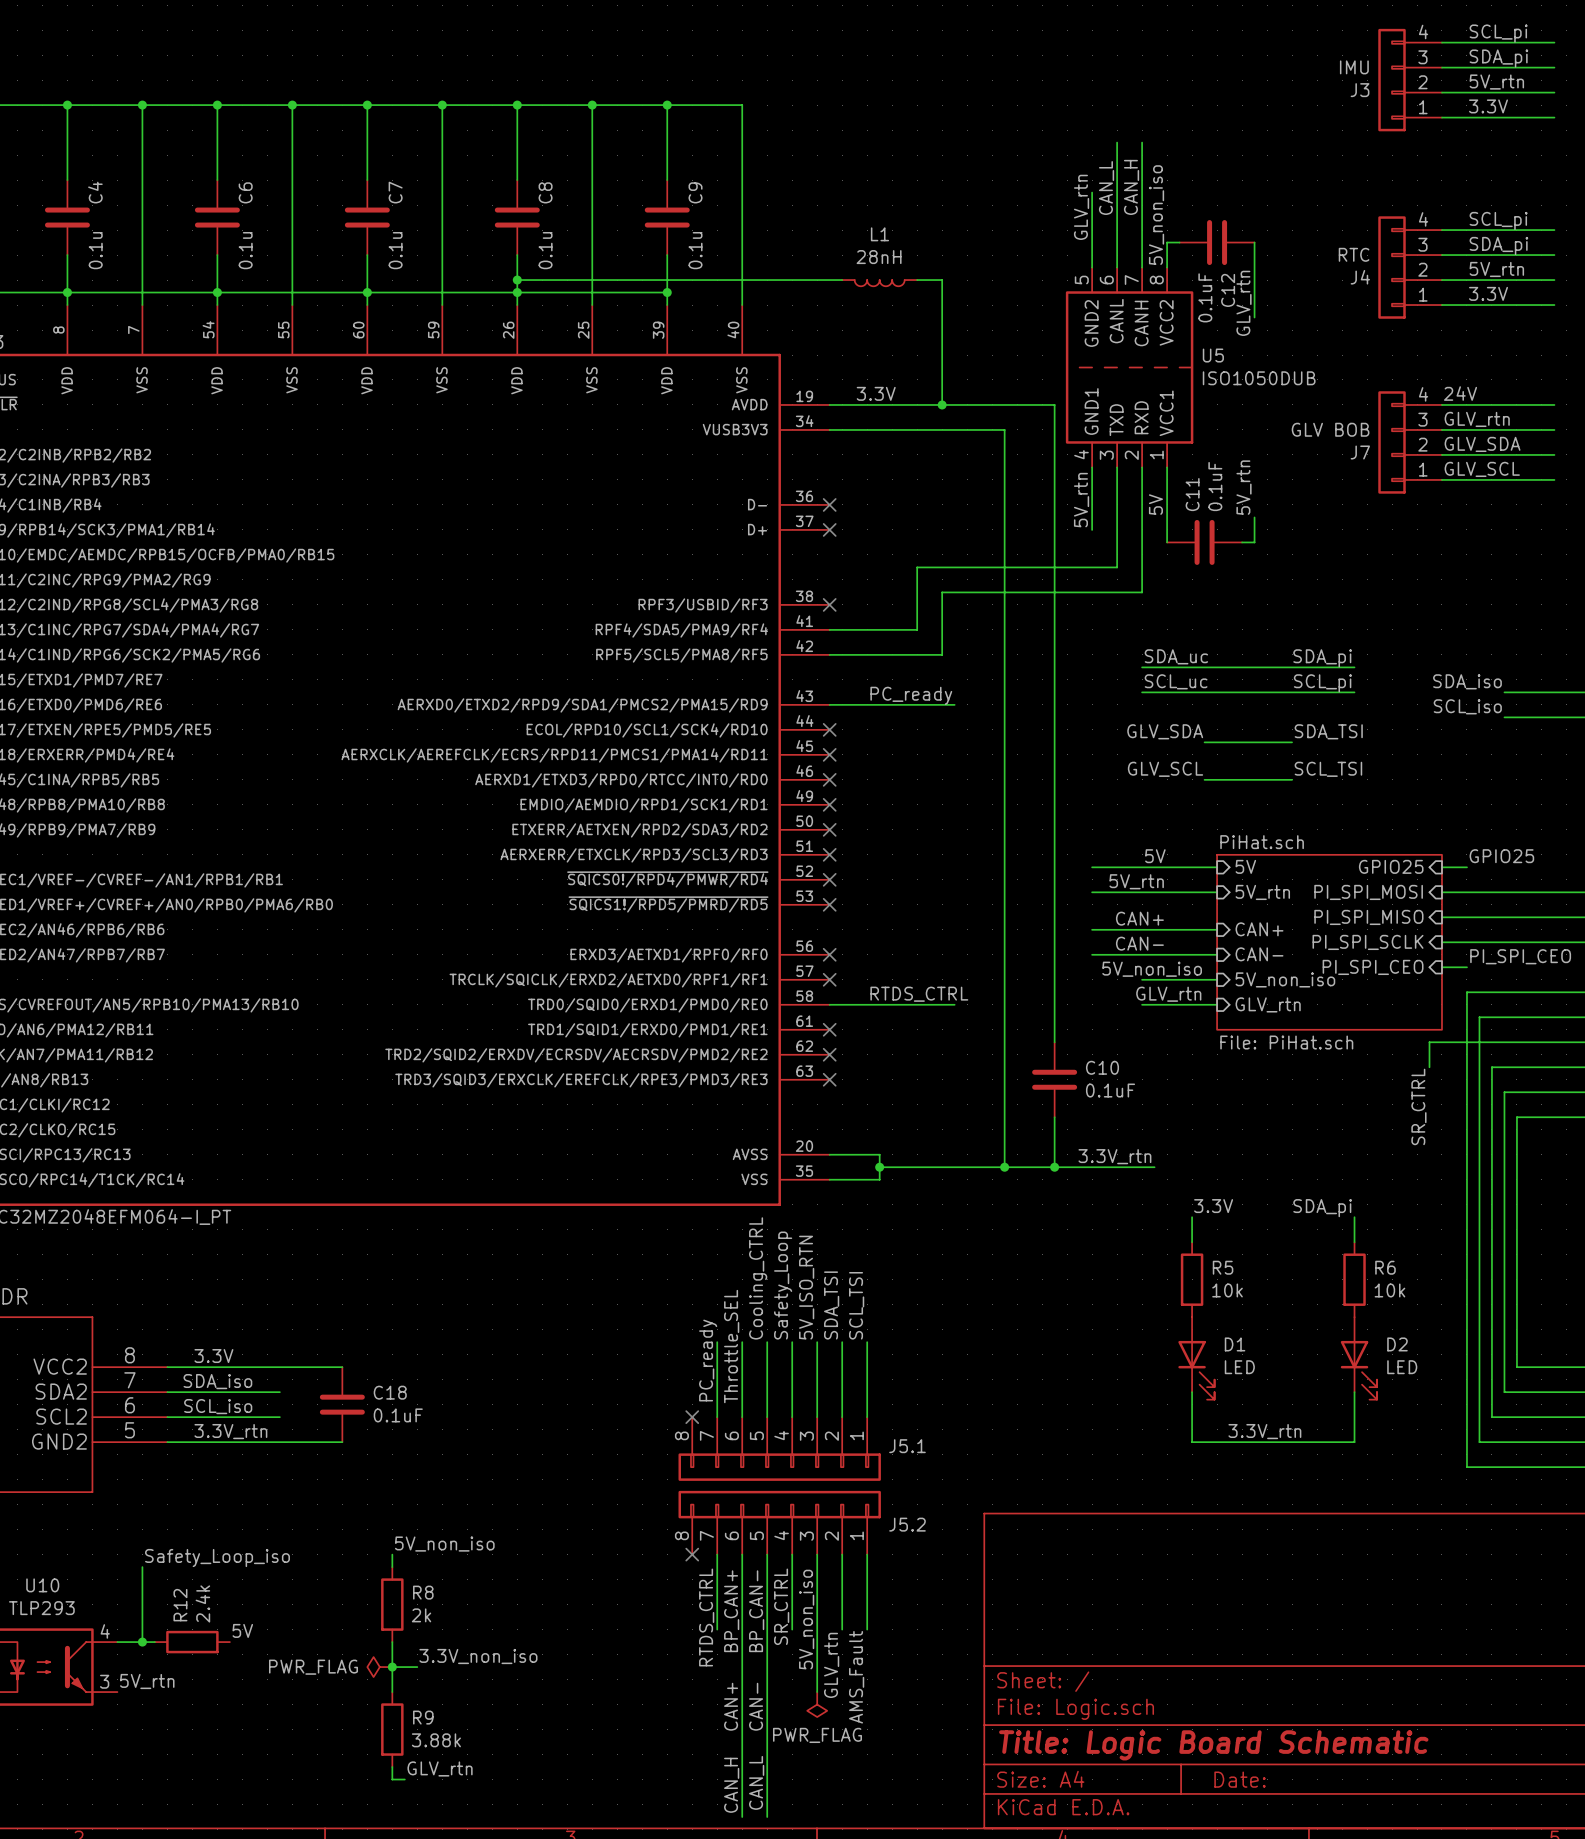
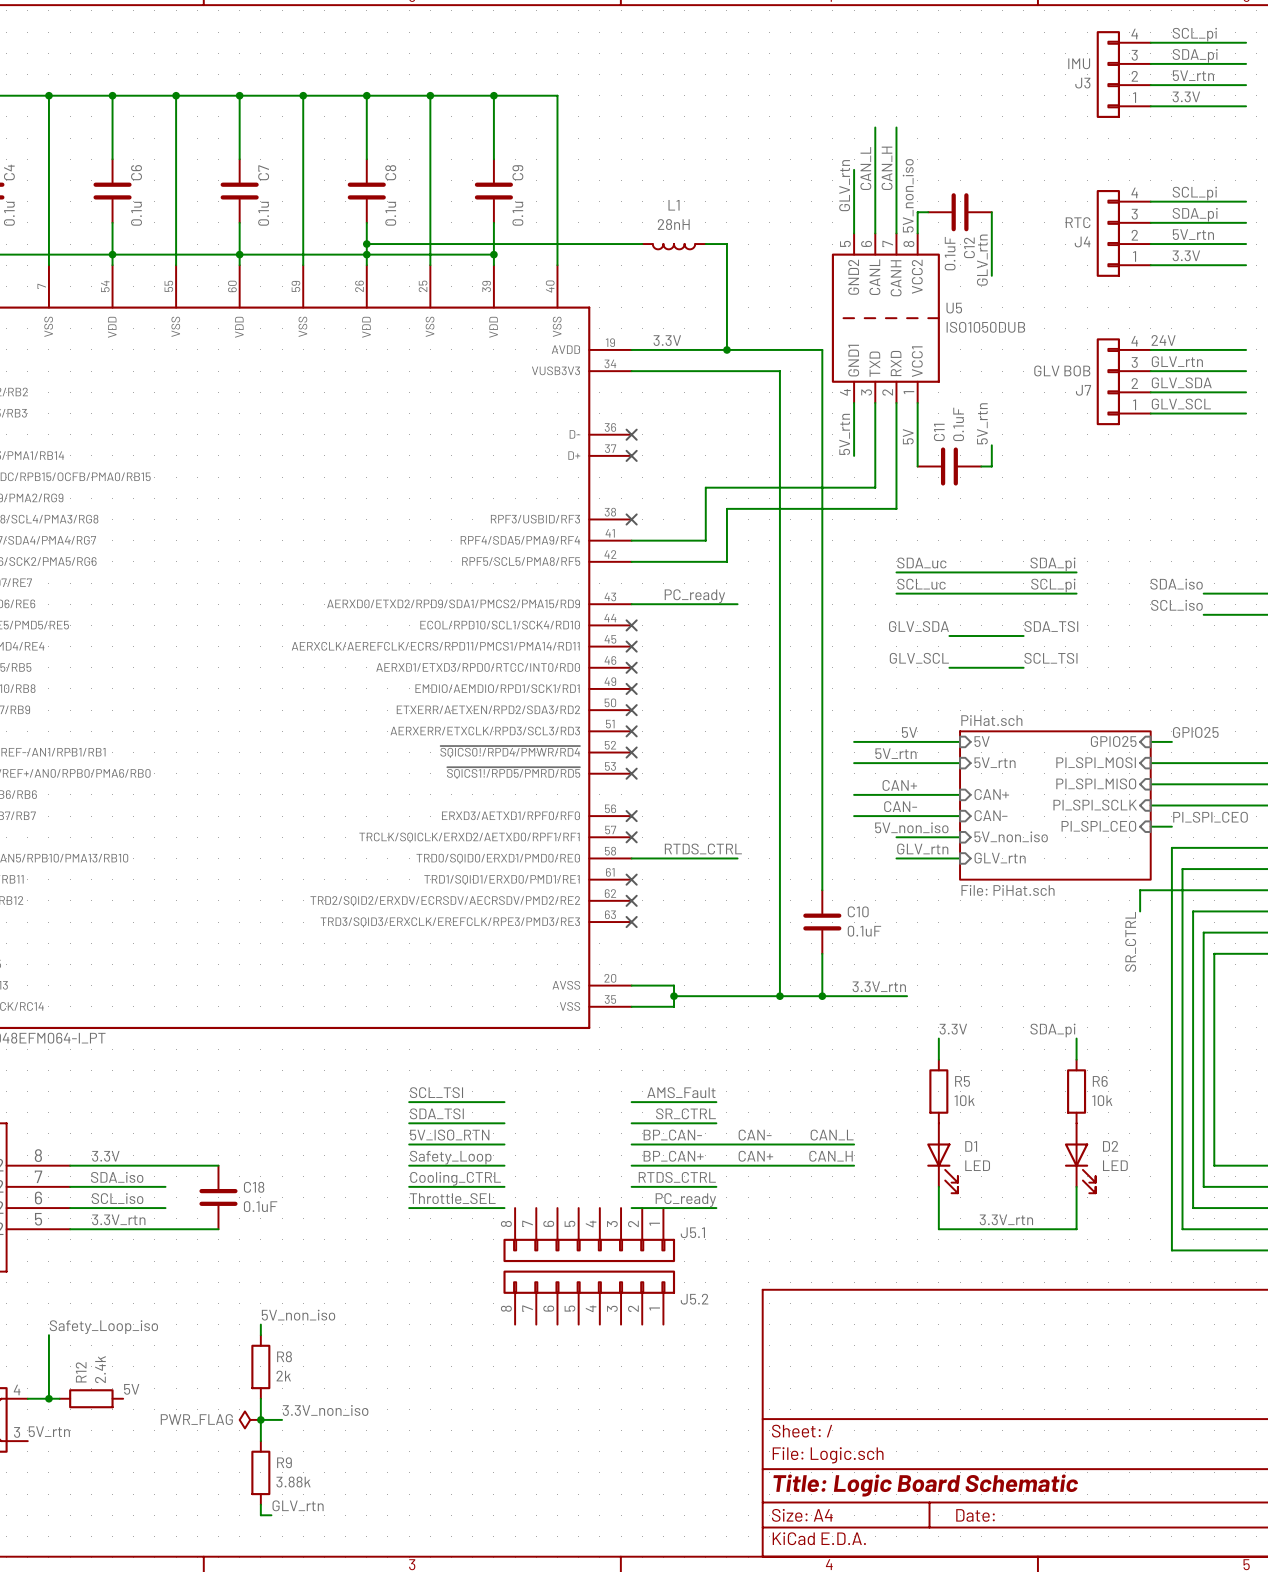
label rotation: 0° (758, 1278) -> 90° clockwise (455, 1178)
label position: Cooling_CTRL (758, 1278) -> Cooling_CTRL (455, 1178)
label: none -> SCL_TSI (436, 1092)
label: none -> AMS_Fault (681, 1092)
label rotation: 0° (783, 1285) -> 90° clockwise (450, 1157)
label position: Safety_Loop (783, 1285) -> Safety_Loop (450, 1157)
label: 5V_ISO_RTN (806, 1287) -> none
wire: none -> (409, 1102) (504, 1102)
wire: none -> (631, 1102) (716, 1102)
label: SDA_TSI (831, 1305) -> none
label: SCL_TSI (856, 1305) -> none
label: none -> SDA_TSI (436, 1113)
label: none -> SR_CTRL (685, 1113)
wire: none -> (409, 1123) (504, 1123)
wire: none -> (631, 1123) (716, 1123)
label: none -> 5V_ISO_RTN (449, 1135)
label: none -> CAN- (755, 1135)
label: none -> CAN_L (832, 1135)
wire: none -> (409, 1144) (504, 1144)
wire: (717, 1342) (717, 1417) -> none
wire: (742, 1342) (742, 1417) -> none
wire: (767, 1342) (767, 1417) -> none
wire: (792, 1342) (792, 1417) -> none
wire: (817, 1342) (817, 1417) -> none
wire: none -> (631, 1144) (854, 1144)
wire: (842, 1342) (842, 1417) -> none
wire: (867, 1342) (867, 1417) -> none
label rotation: 0° (731, 1346) -> 90° clockwise (452, 1198)
label: none -> CAN+ (755, 1156)
label: none -> CAN_H (831, 1156)
label rotation: 0° (708, 1360) -> 90° clockwise (685, 1200)
label position: PC_ready (708, 1360) -> PC_ready (685, 1200)
wire: none -> (409, 1165) (504, 1165)
wire: none -> (631, 1165) (854, 1165)
label: none -> RTDS_CTRL (677, 1177)
wire: none -> (409, 1186) (504, 1186)
wire: none -> (631, 1186) (716, 1186)
wire: none -> (409, 1208) (504, 1208)
no-connect mark: (692, 1417) -> none
wire: none -> (631, 1208) (716, 1208)
no-connect mark: (692, 1554) -> none
wire: (717, 1554) (717, 1629) -> none
wire: (742, 1554) (742, 1817) -> none
wire: (767, 1554) (767, 1817) -> none
wire: (792, 1554) (792, 1629) -> none
wire: (817, 1554) (817, 1692) -> none
wire: (842, 1554) (842, 1629) -> none
wire: (867, 1554) (867, 1629) -> none
label: SR_CTRL (781, 1606) -> none
label rotation: 0° (731, 1611) -> 90° clockwise (673, 1156)
label position: BP_CAN+ (731, 1611) -> BP_CAN+ (673, 1156)
label rotation: 0° (756, 1611) -> 90° clockwise (672, 1135)
label position: BP_CAN- (756, 1611) -> BP_CAN- (672, 1135)
label: RTDS_CTRL (706, 1617) -> none
label: 5V_non_iso (806, 1619) -> none
label: GLV_rtn (831, 1665) -> none
label: AMS_Fault (856, 1677) -> none
power symbol: PWR_FLAG (817, 1704) -> none
label: CAN+ (731, 1706) -> none
label: CAN- (756, 1706) -> none
label: CAN_L (756, 1782) -> none
label: CAN_H (731, 1785) -> none

